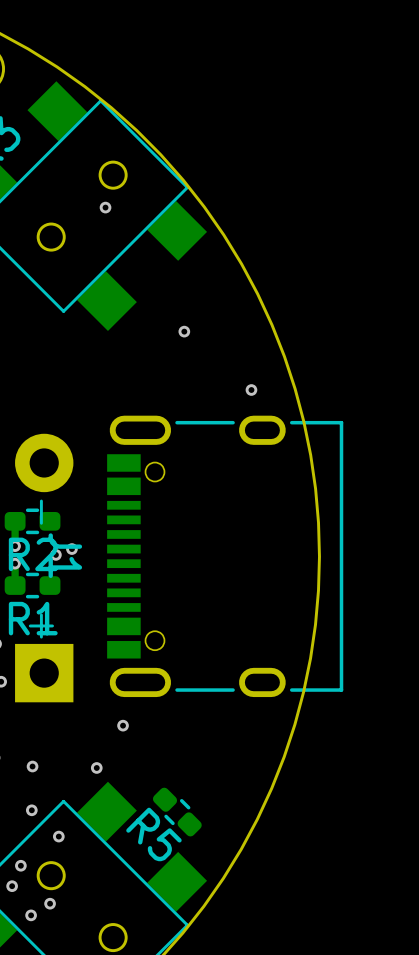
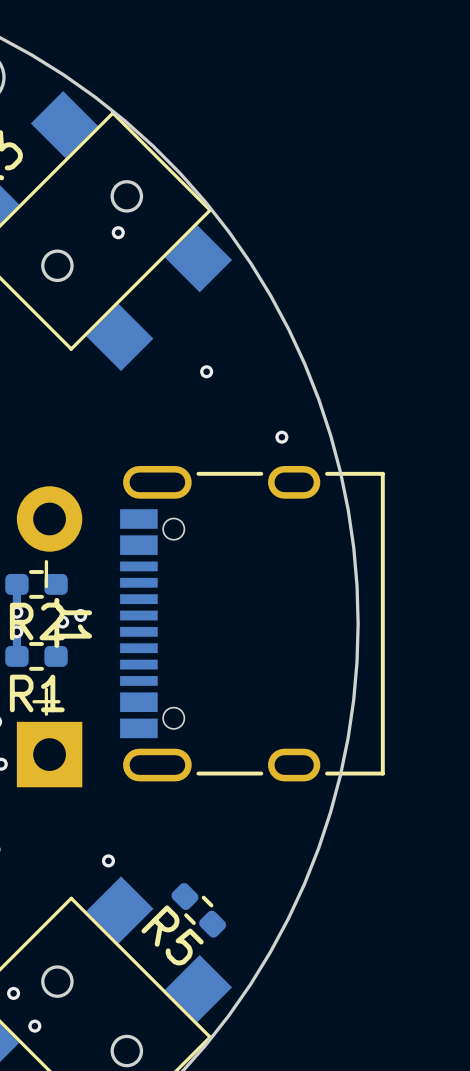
via: (123, 725) -> none
via: (32, 766) -> none
via: (31, 810) -> none
via: (58, 836) -> none
via: (20, 865) -> none
via: (50, 903) -> none

